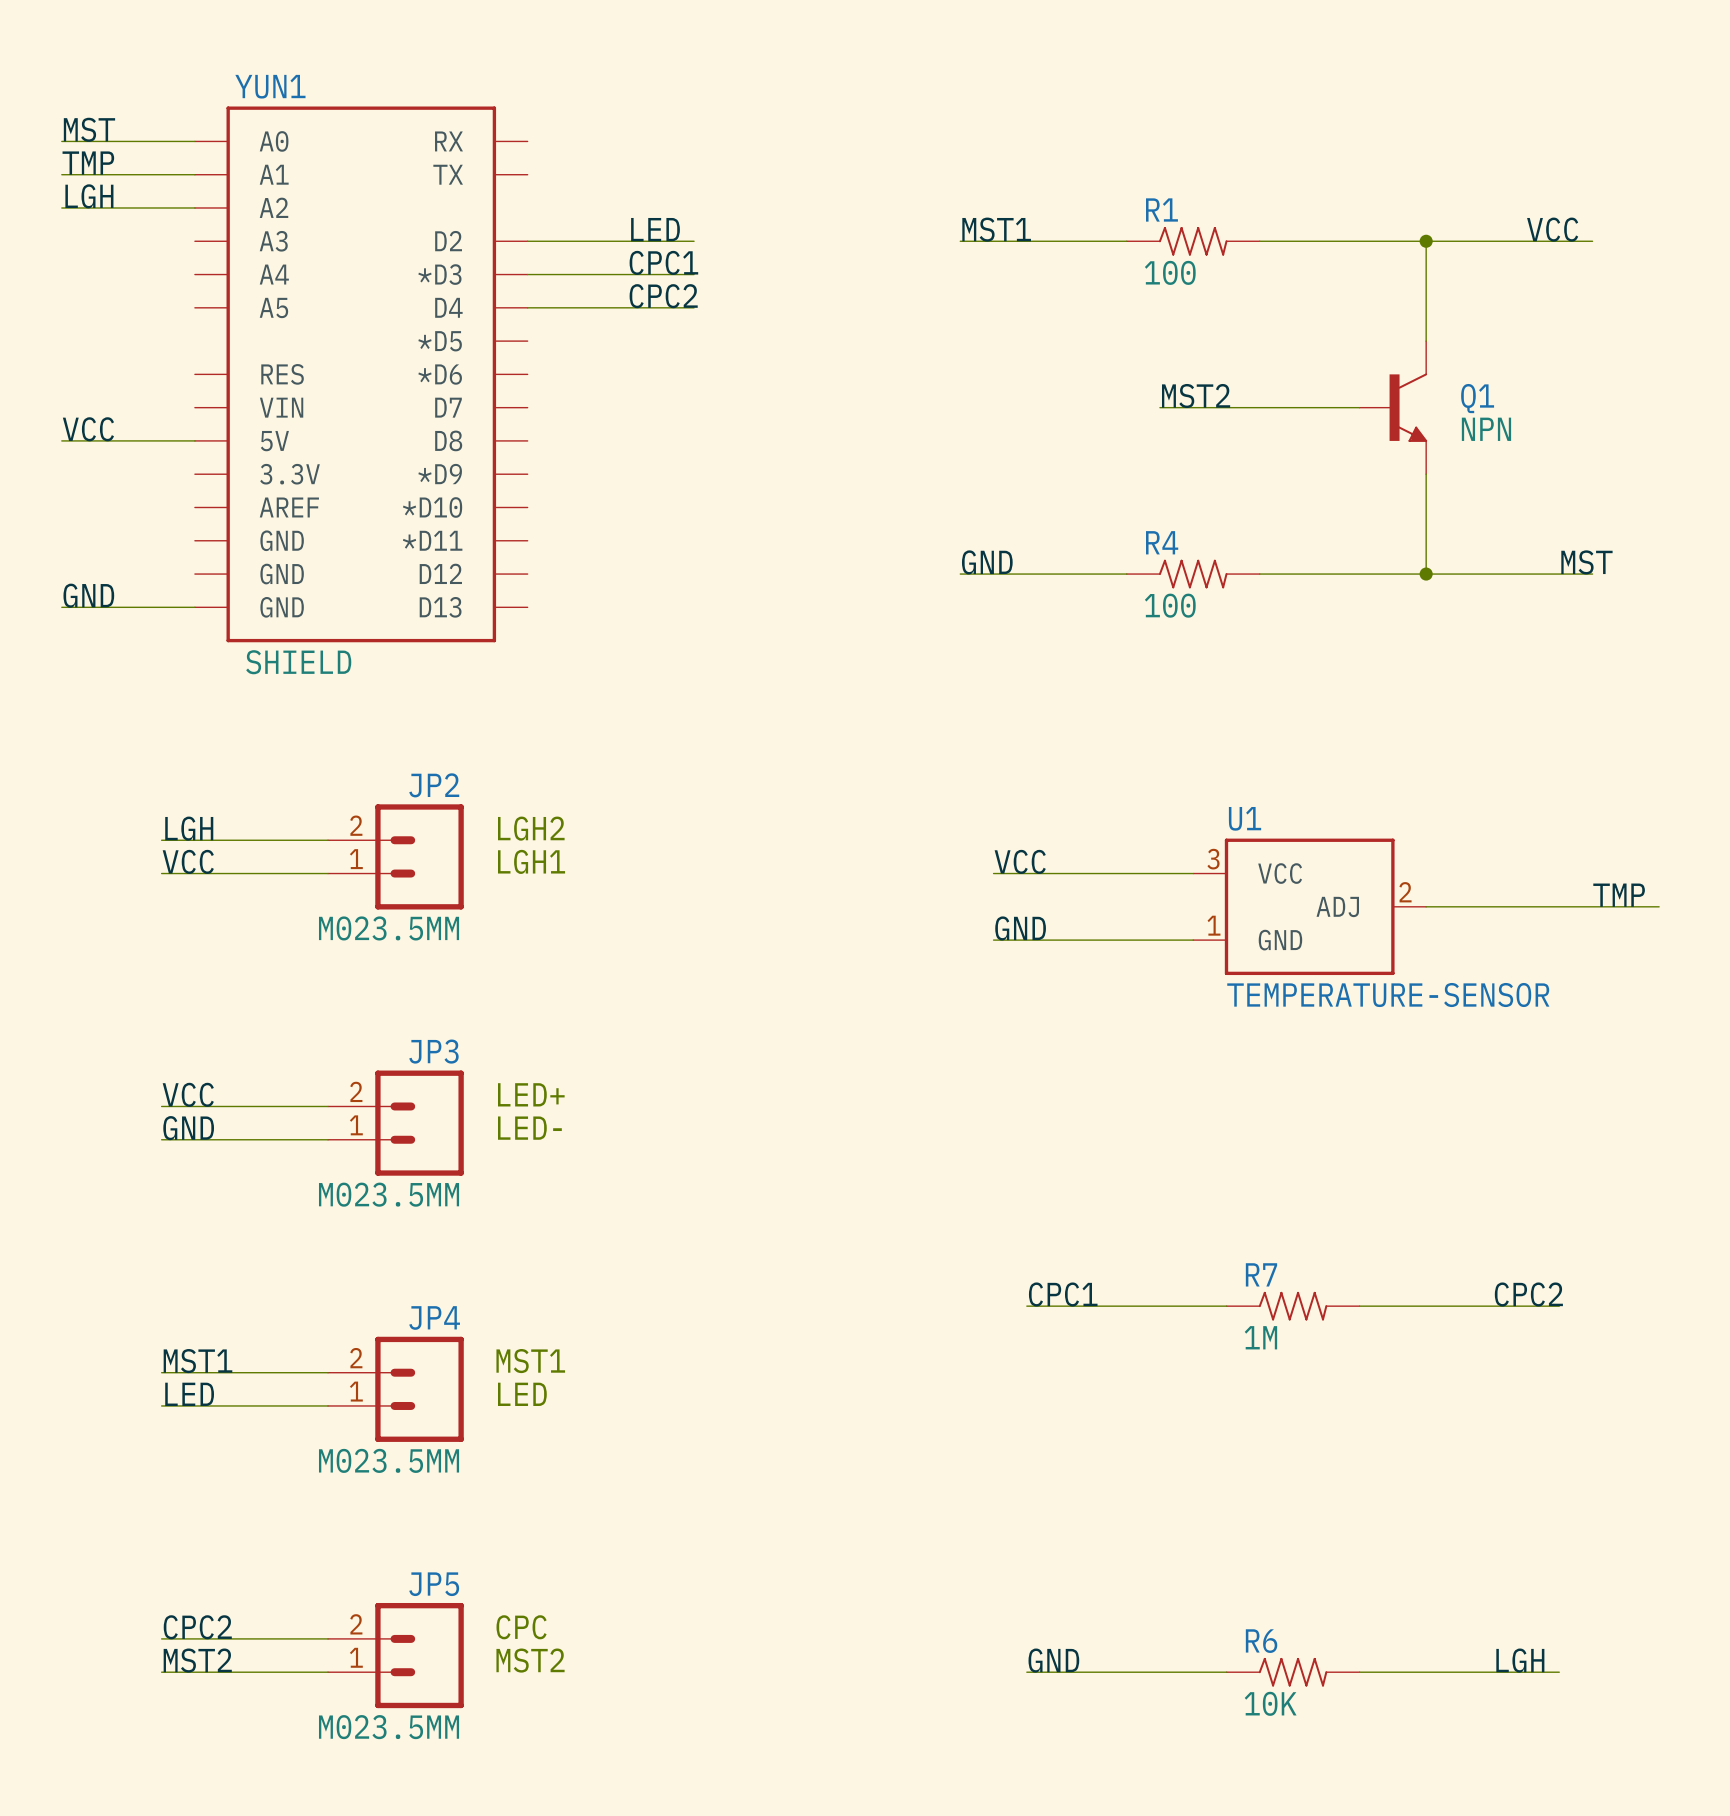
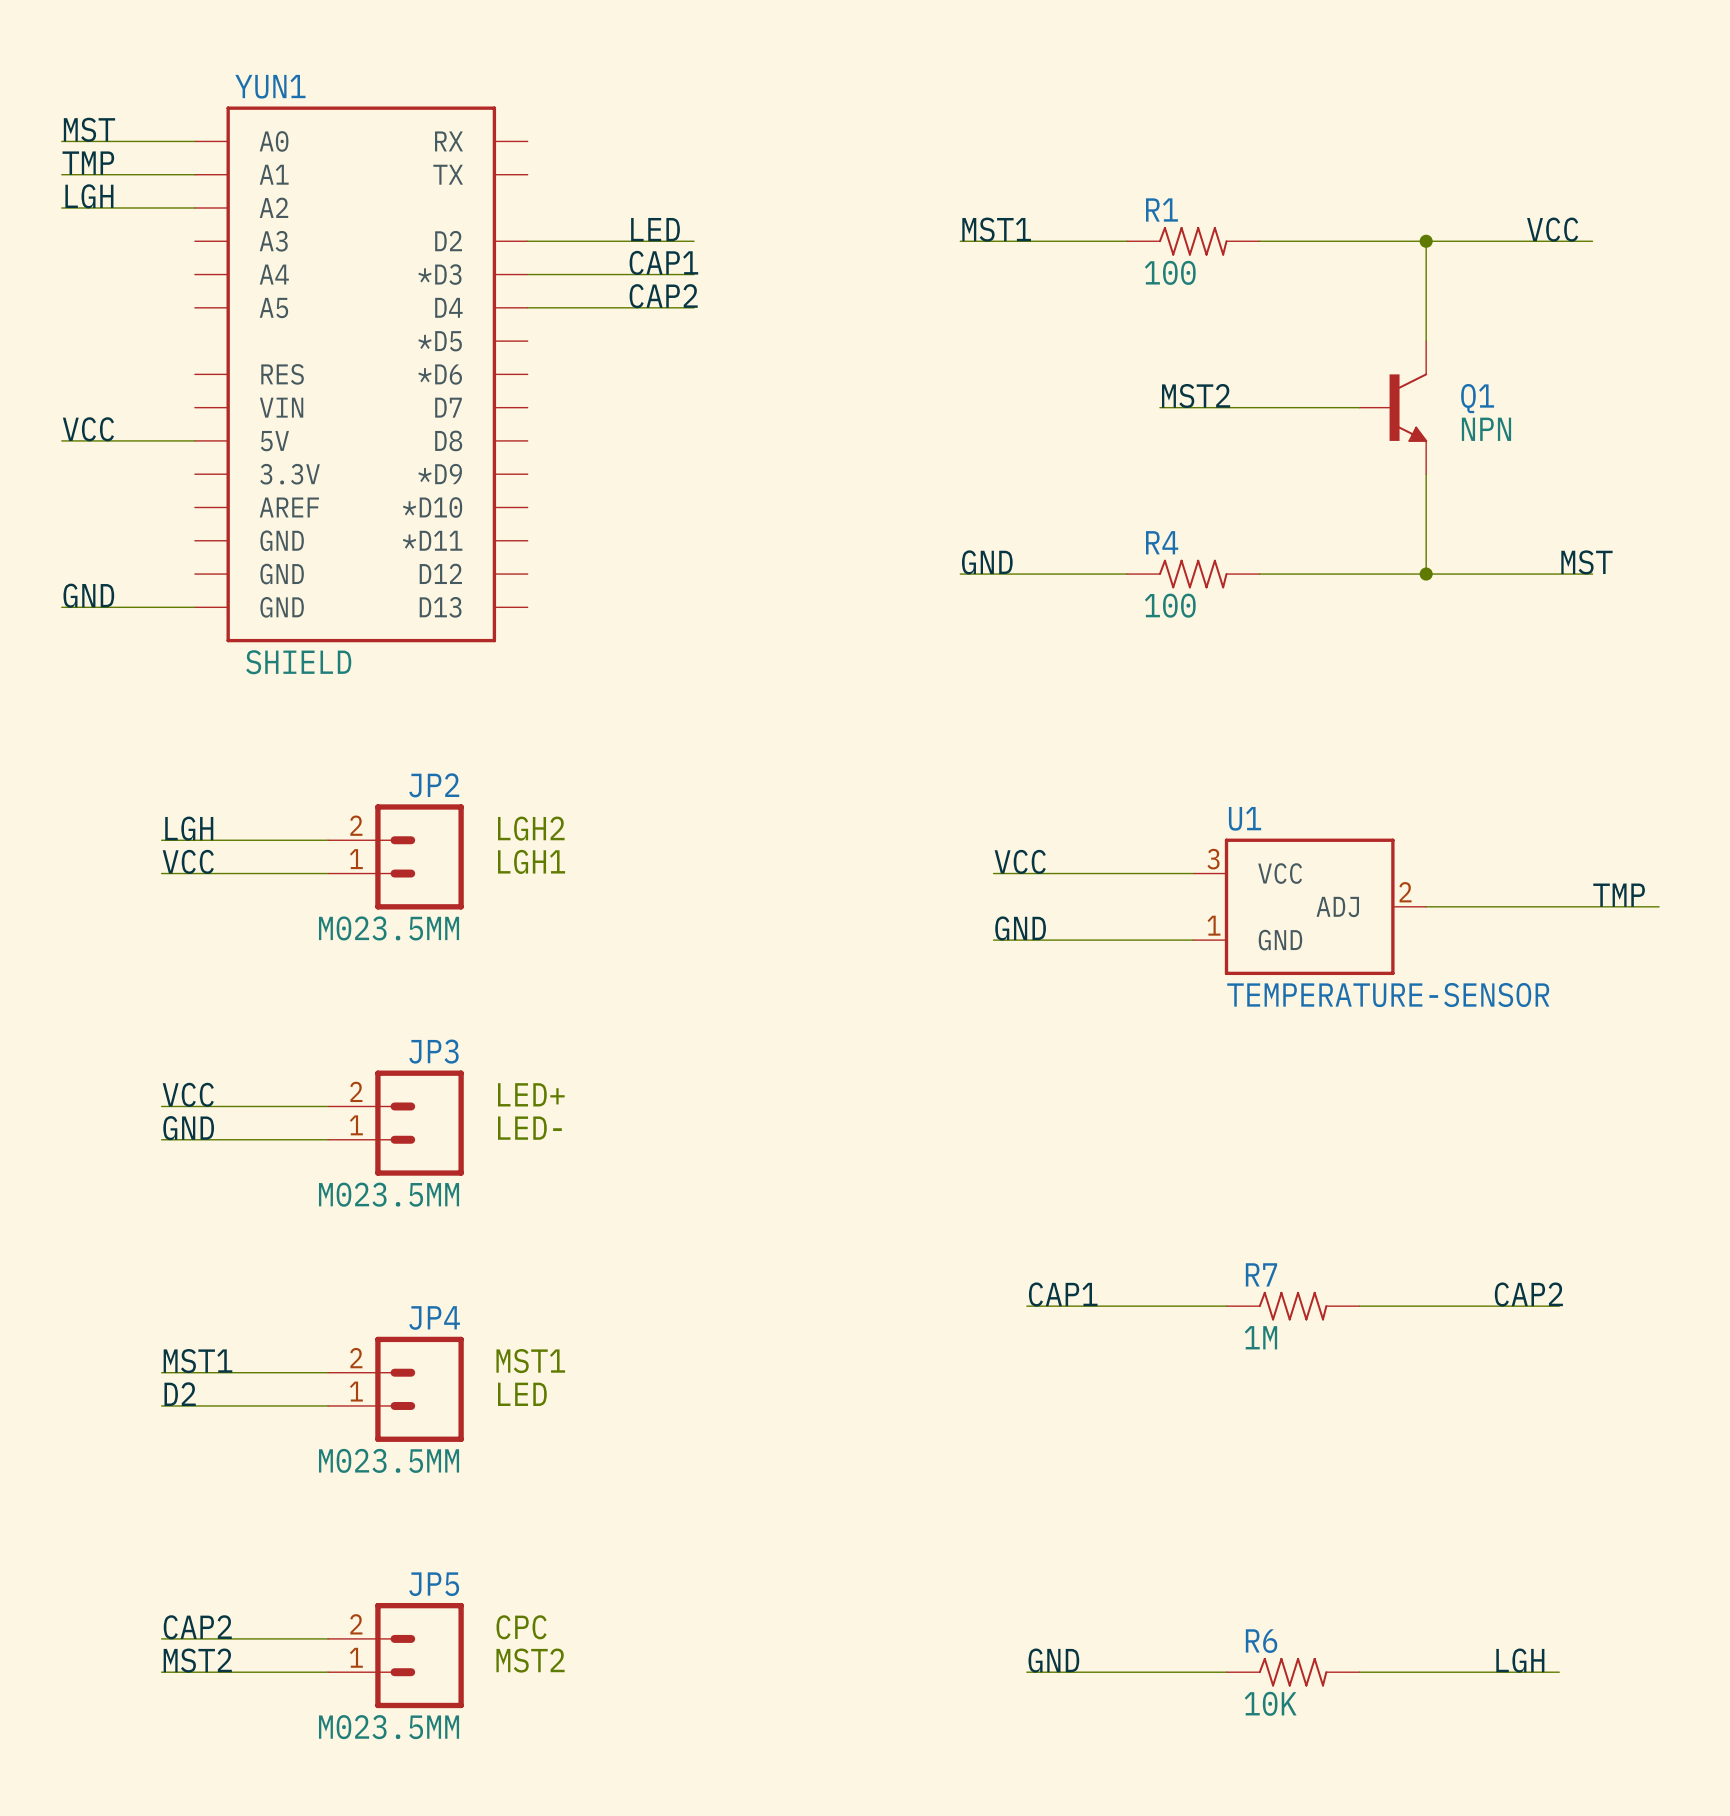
label: CPC1 (663, 262) -> CAP1 (663, 262)
label: CPC2 (663, 296) -> CAP2 (663, 296)
label: CPC1 (1063, 1294) -> CAP1 (1063, 1294)
label: CPC2 (1528, 1294) -> CAP2 (1528, 1294)
label: LED (189, 1394) -> D2 (180, 1394)
label: CPC2 (197, 1627) -> CAP2 (197, 1627)

